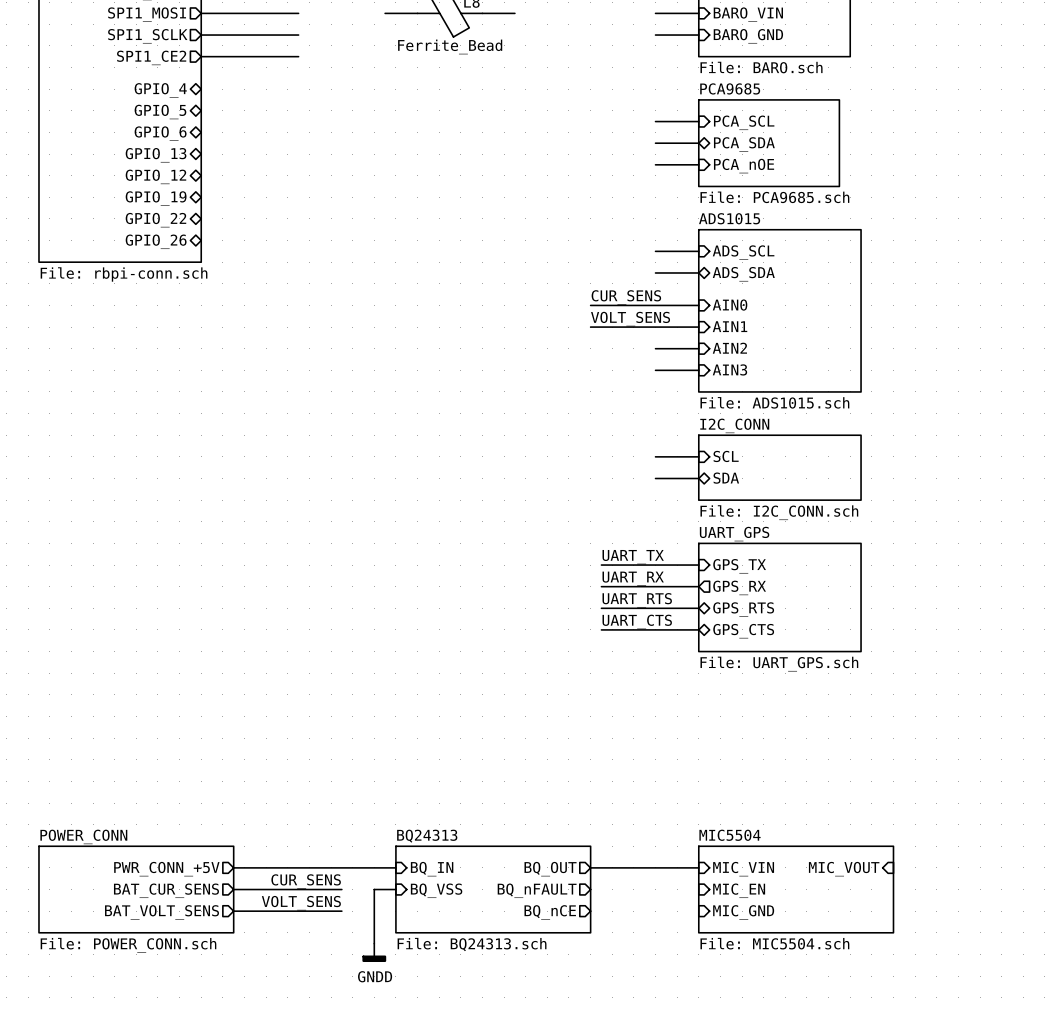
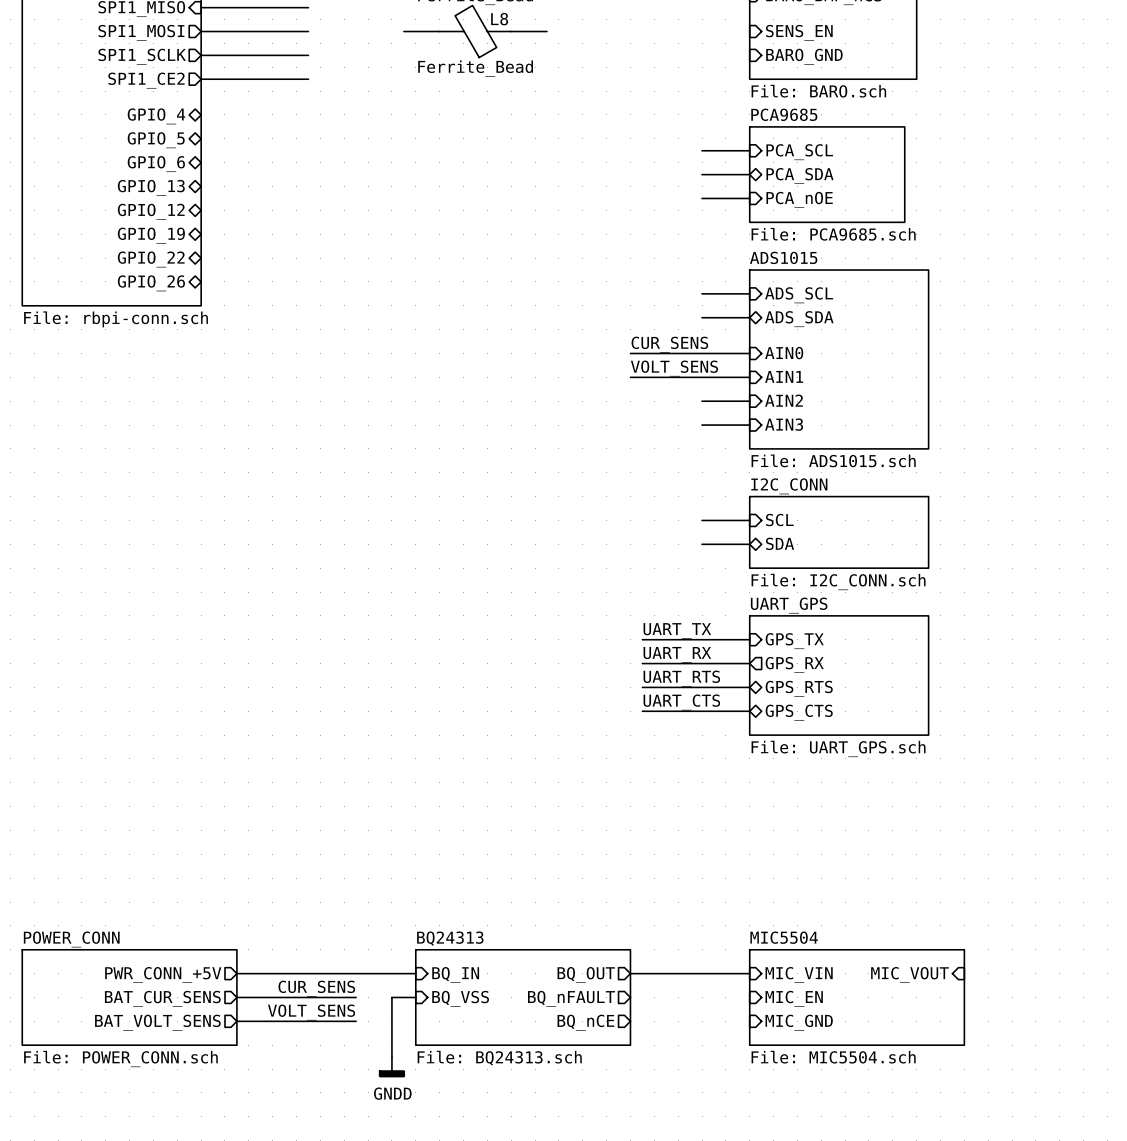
wire: (655, 13) (698, 13) -> none
sheet pin: BARO_VIN (748, 14) -> SENS_EN (799, 32)
wire: (655, 35) (698, 35) -> none

